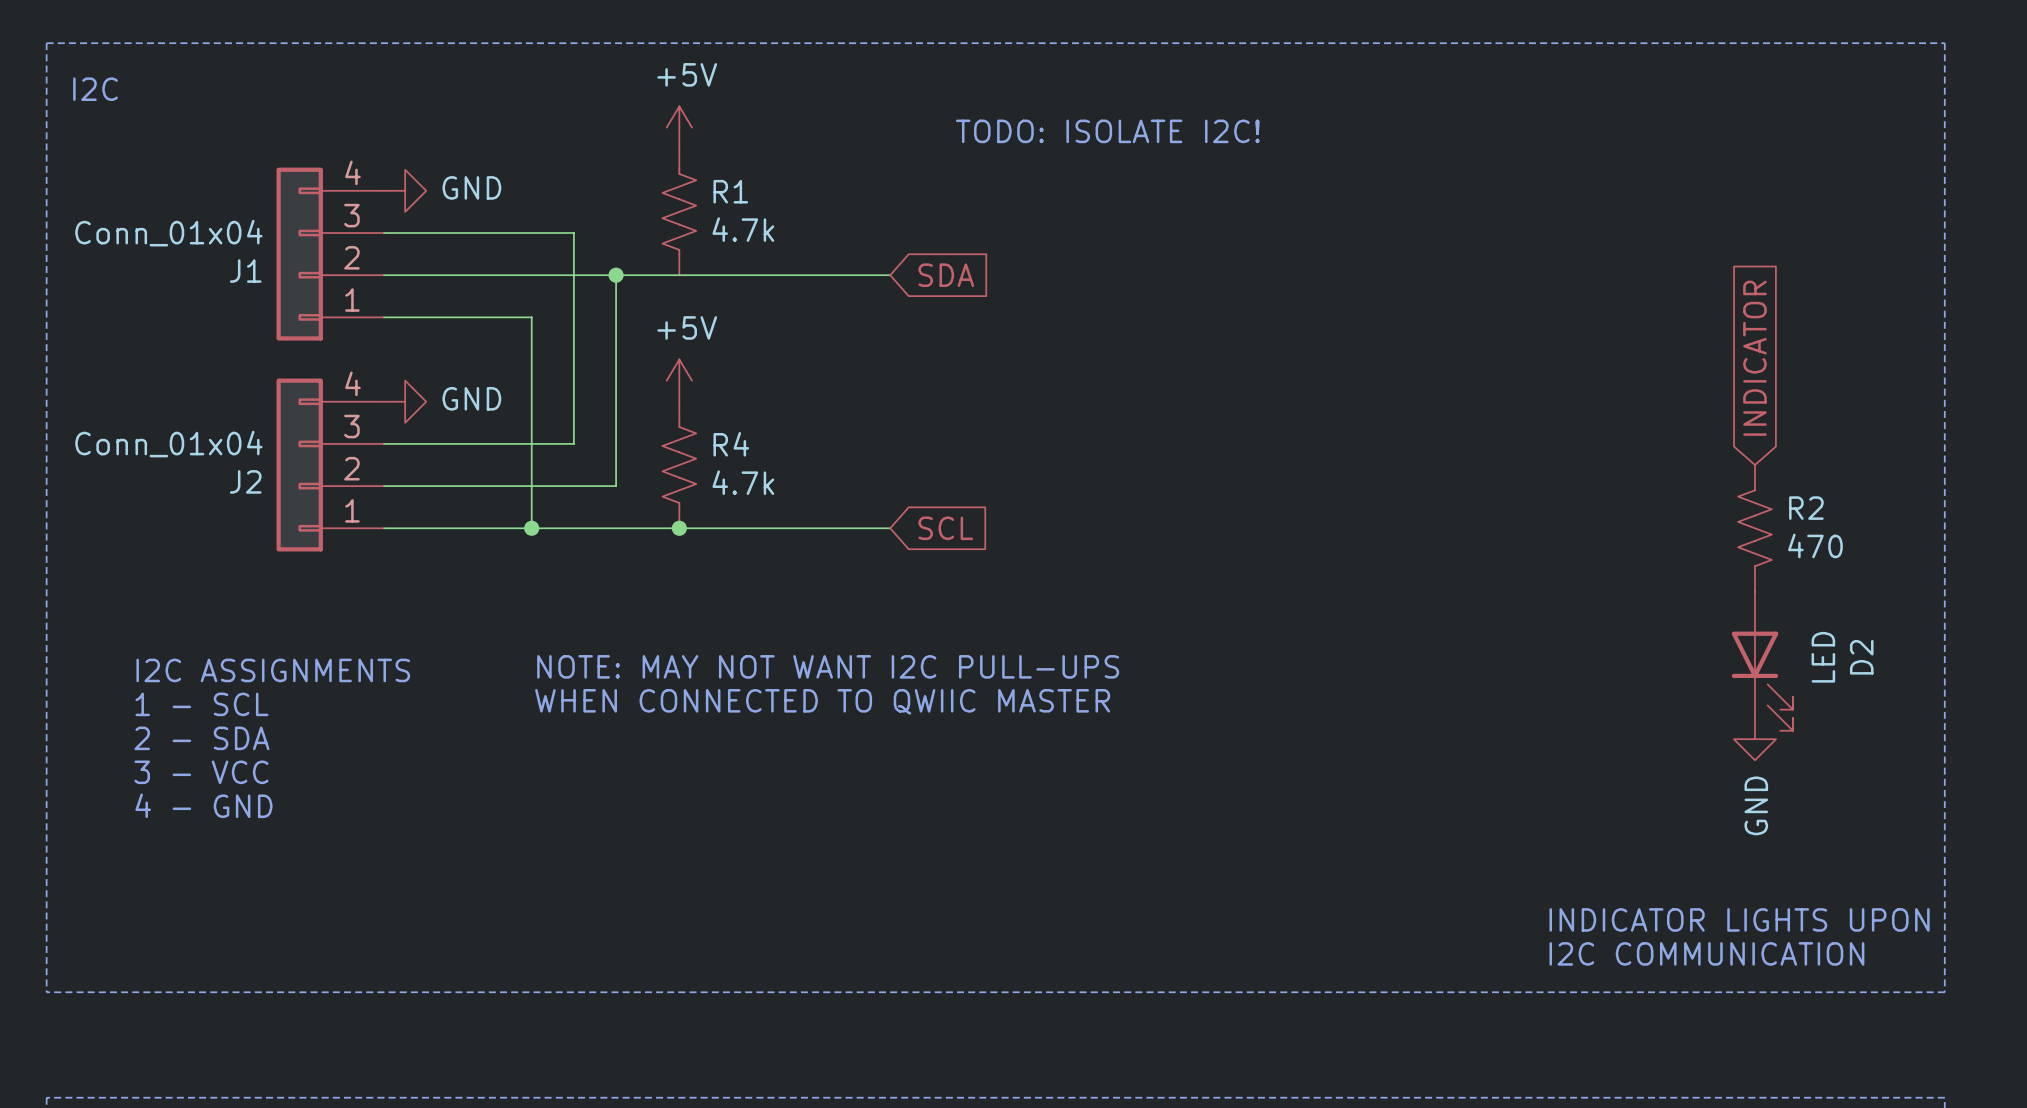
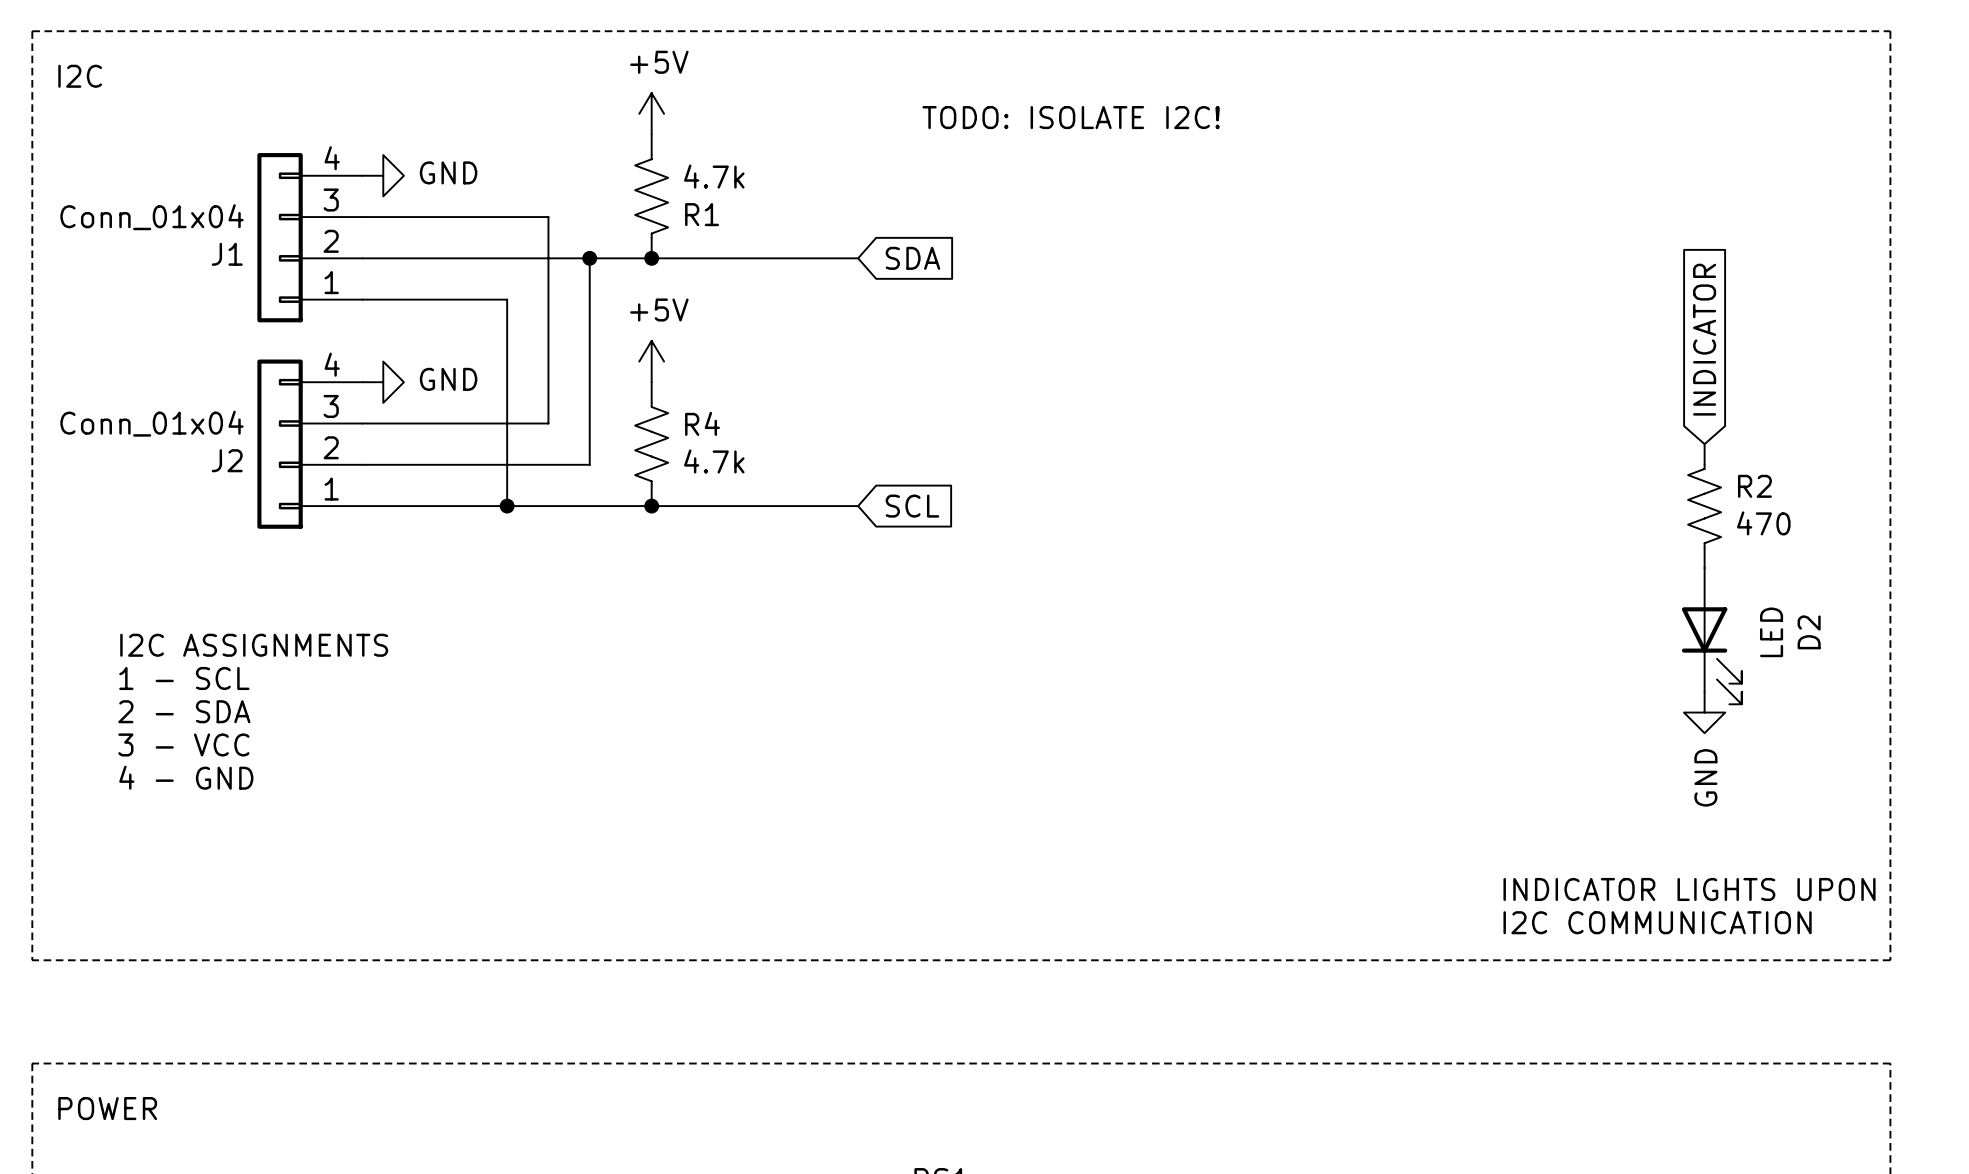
R1 name position: R1 (730, 191) -> R1 (702, 214)
R1 flip: as is (679, 211) -> left-right (651, 196)
R1 value position: 4.7k (743, 229) -> 4.7k (714, 176)
junction: none -> (651, 258)
text: NOTE: MAY NOT WANT I2C PULL-UPS (828, 666) -> none
text: WHEN CONNECTED TO QWIIC MASTER (822, 701) -> none

